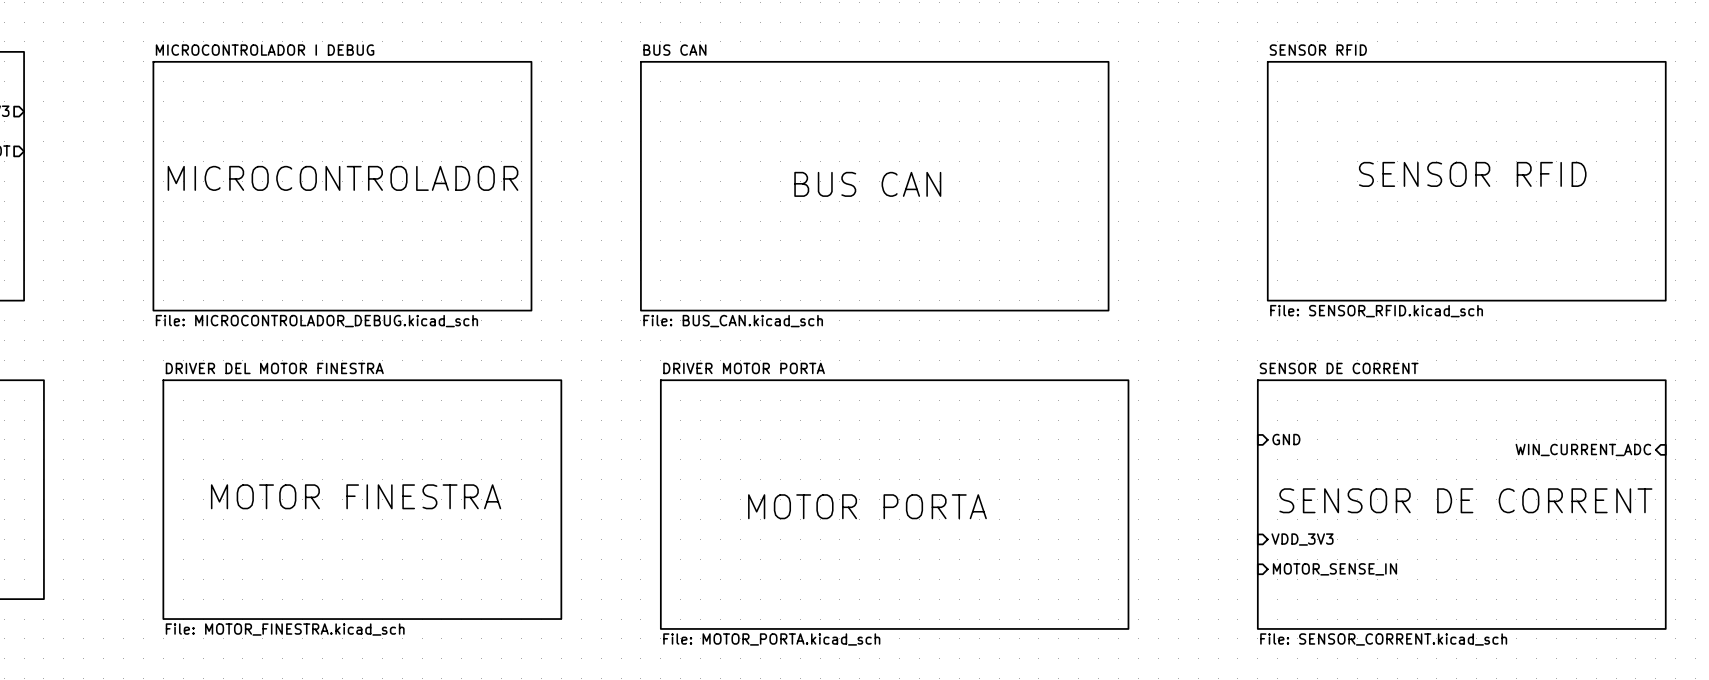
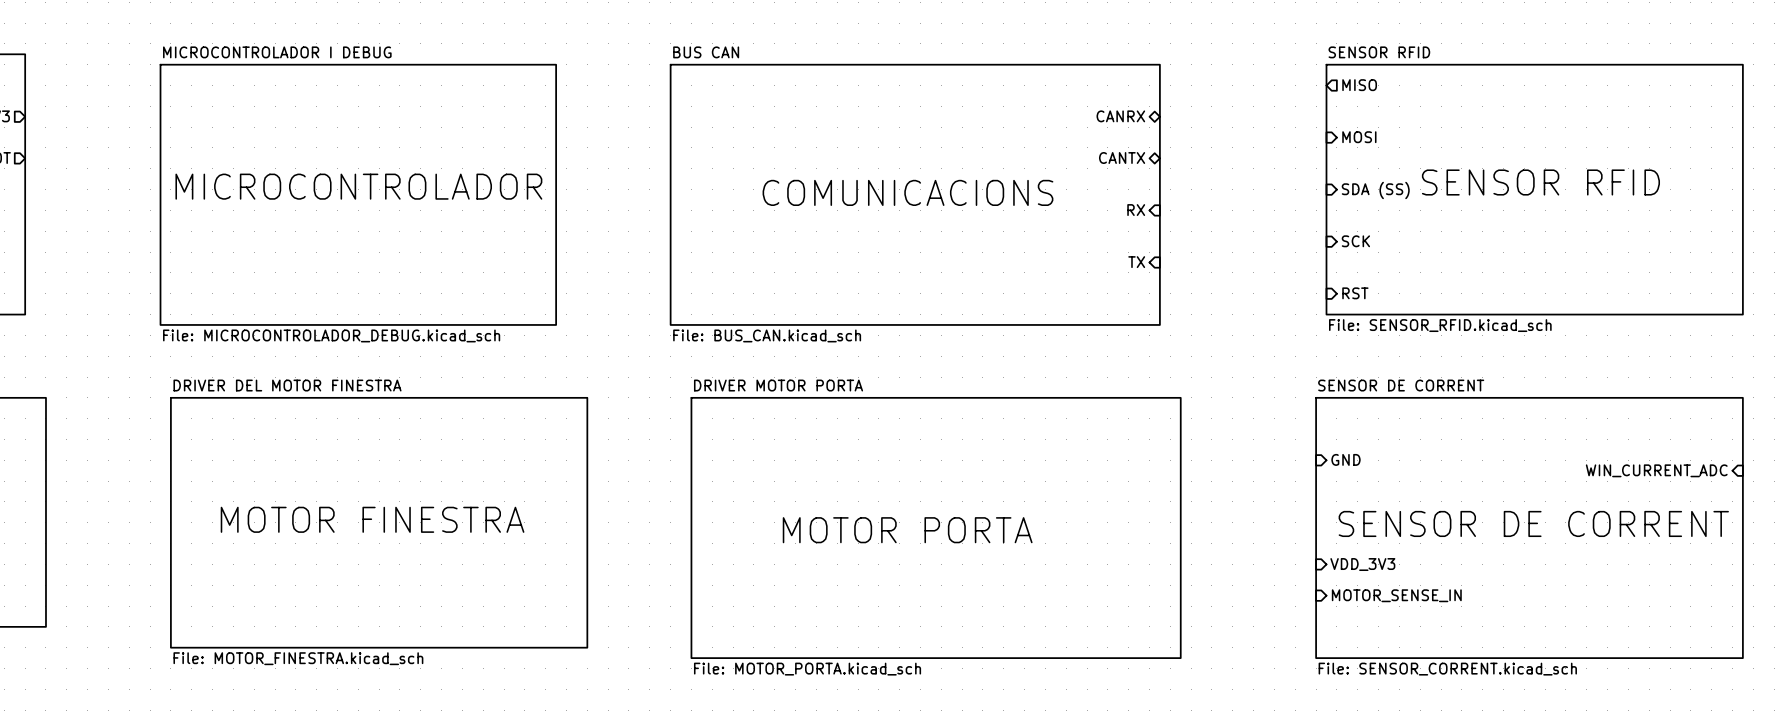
sheet pin: none -> MISO (1359, 85)
sheet pin: none -> CANRX (1120, 116)
sheet pin: none -> MOSI (1359, 137)
sheet pin: none -> CANTX (1122, 158)
sheet pin: none -> SDA (SS) (1375, 190)
text: BUS CAN (867, 184) -> COMUNICACIONS (907, 192)
sheet pin: none -> RX (1136, 210)
sheet pin: none -> SCK (1355, 241)
sheet pin: none -> TX (1136, 262)
sheet pin: none -> RST (1355, 293)

